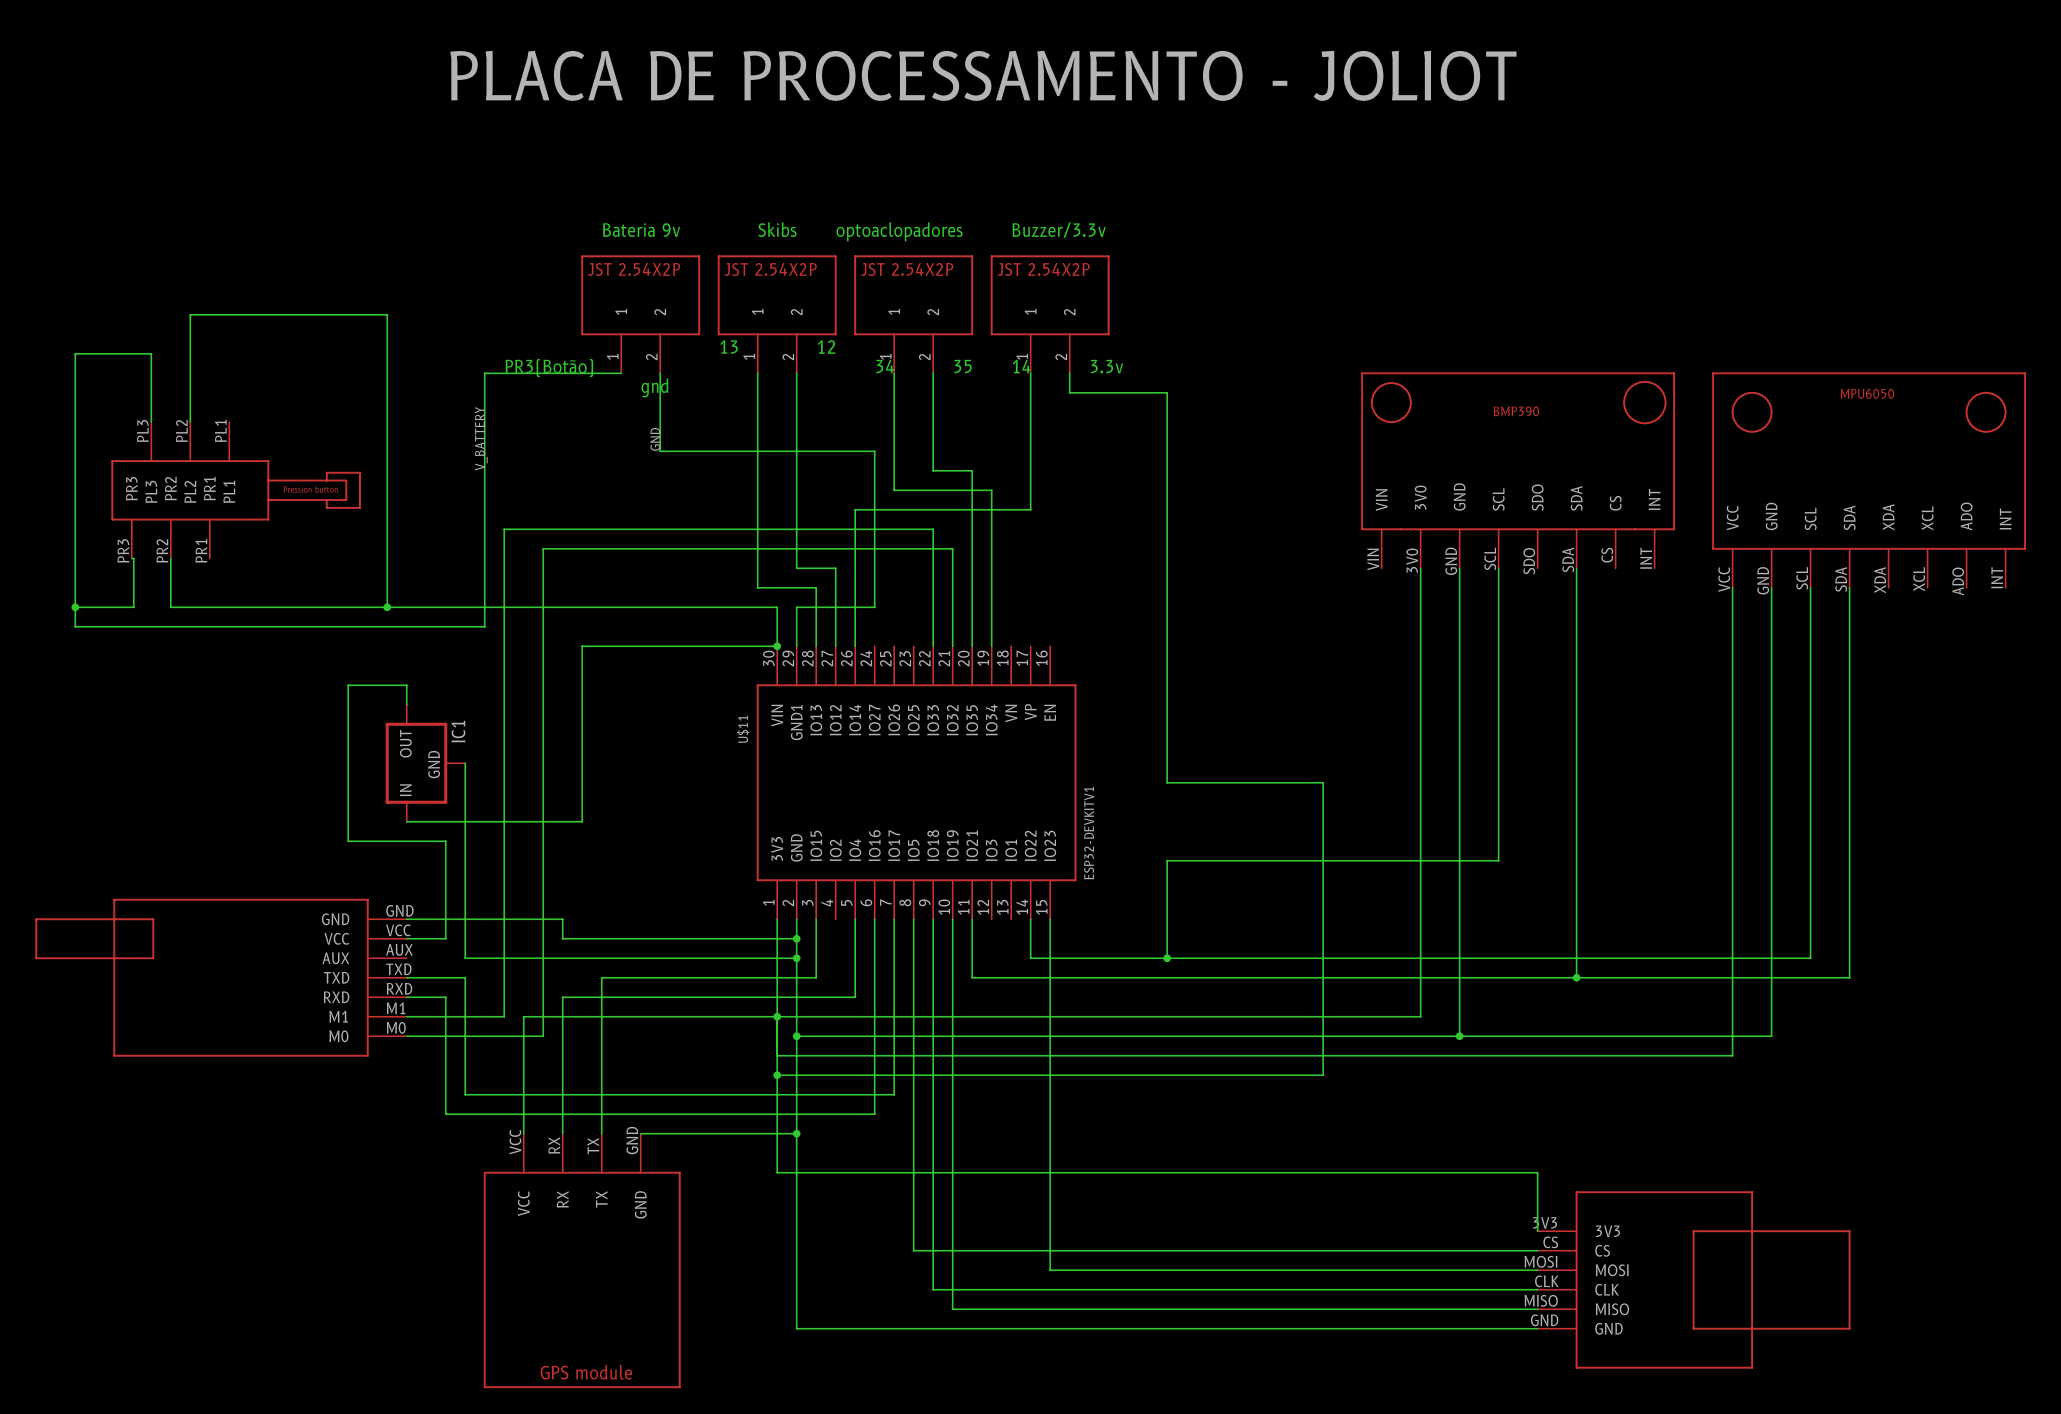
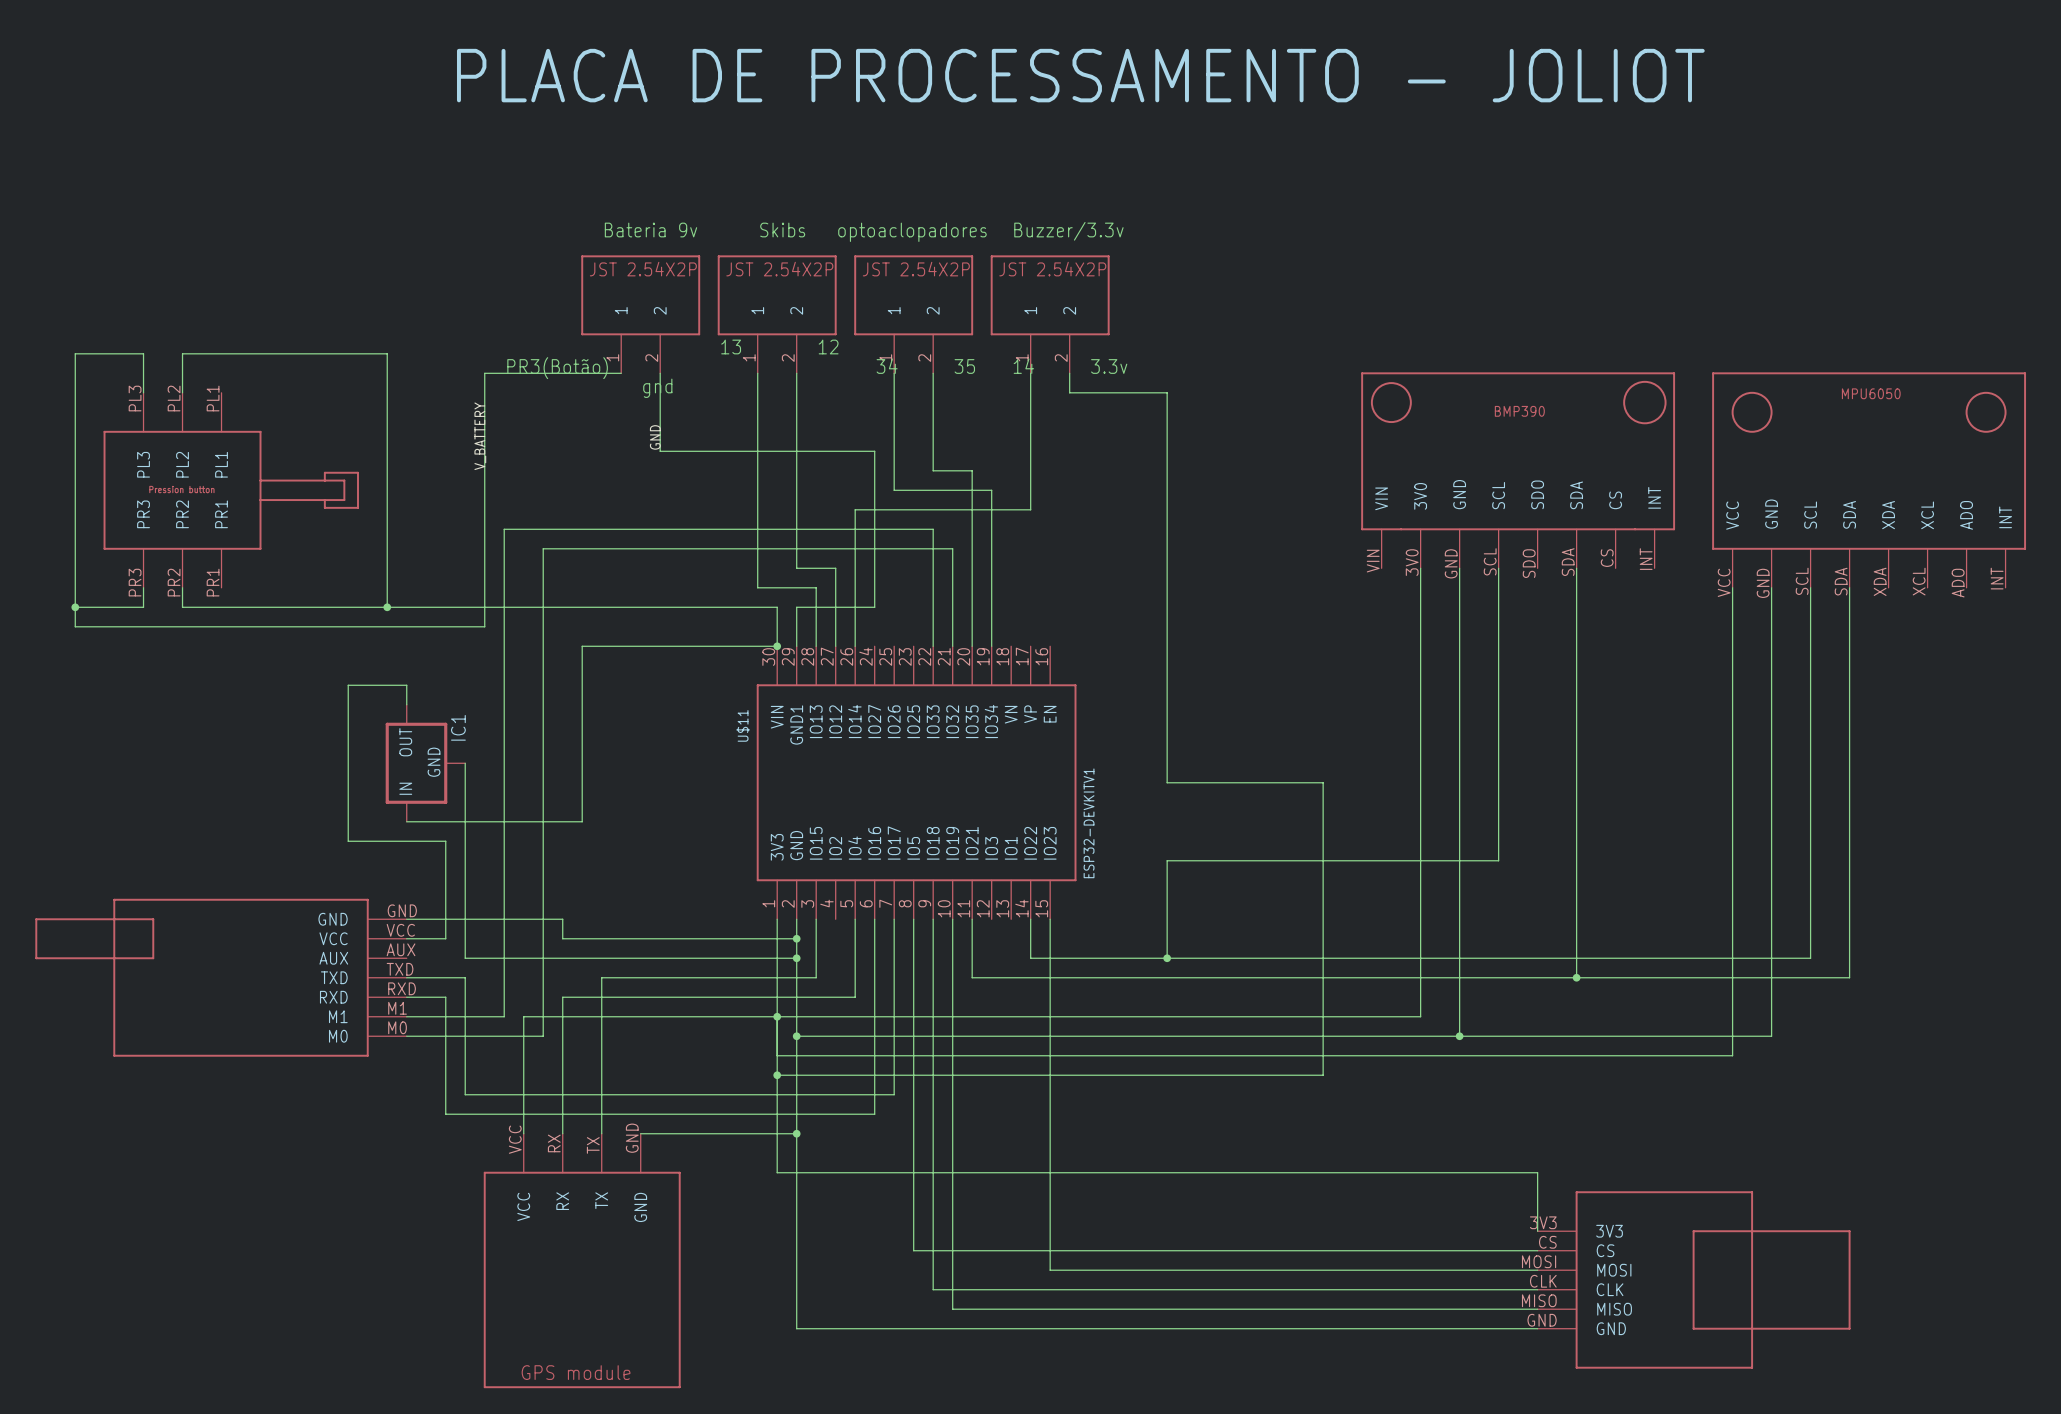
wire: (143, 353) (151, 353) (151, 422) -> (143, 353) (143, 392)
wire: (387, 353) (387, 314) (190, 314) (190, 422) -> (387, 353) (182, 353) (182, 392)
part symbol: [111, 422, 361, 559] -> [103, 392, 359, 588]
wire: (131, 558) (133, 558) (133, 607) -> (143, 587) (143, 607) (133, 607)
wire: (170, 558) (170, 607) (182, 607) -> (182, 587) (182, 607)

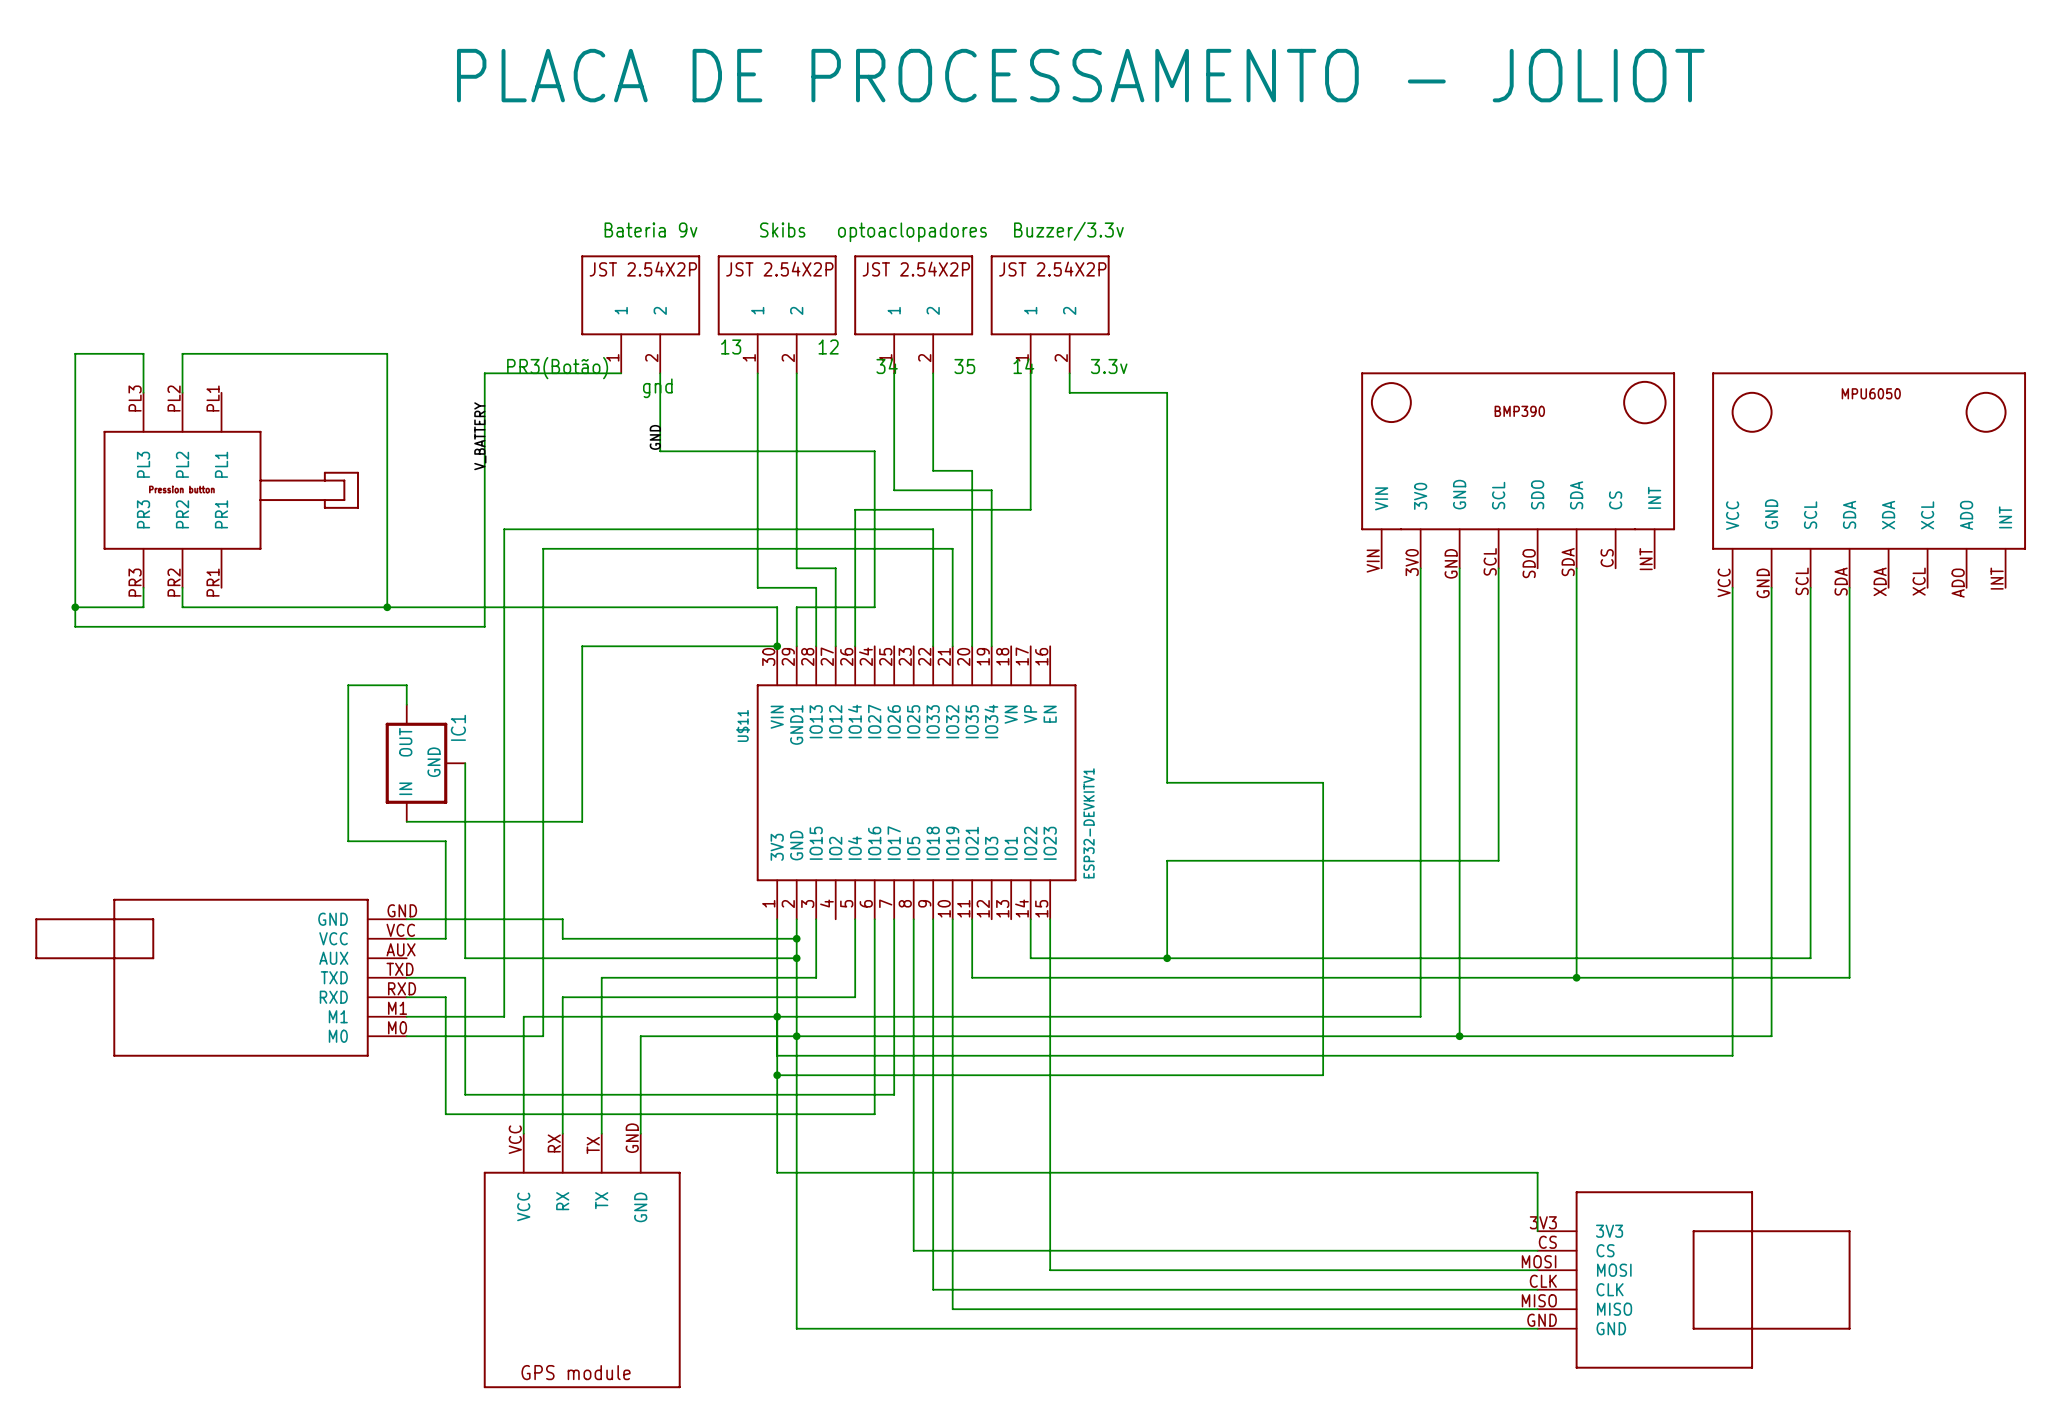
wire: (640, 1133) (796, 1133) -> (640, 1133) (640, 1036) (796, 1036)
junction: (796, 1133) -> none

